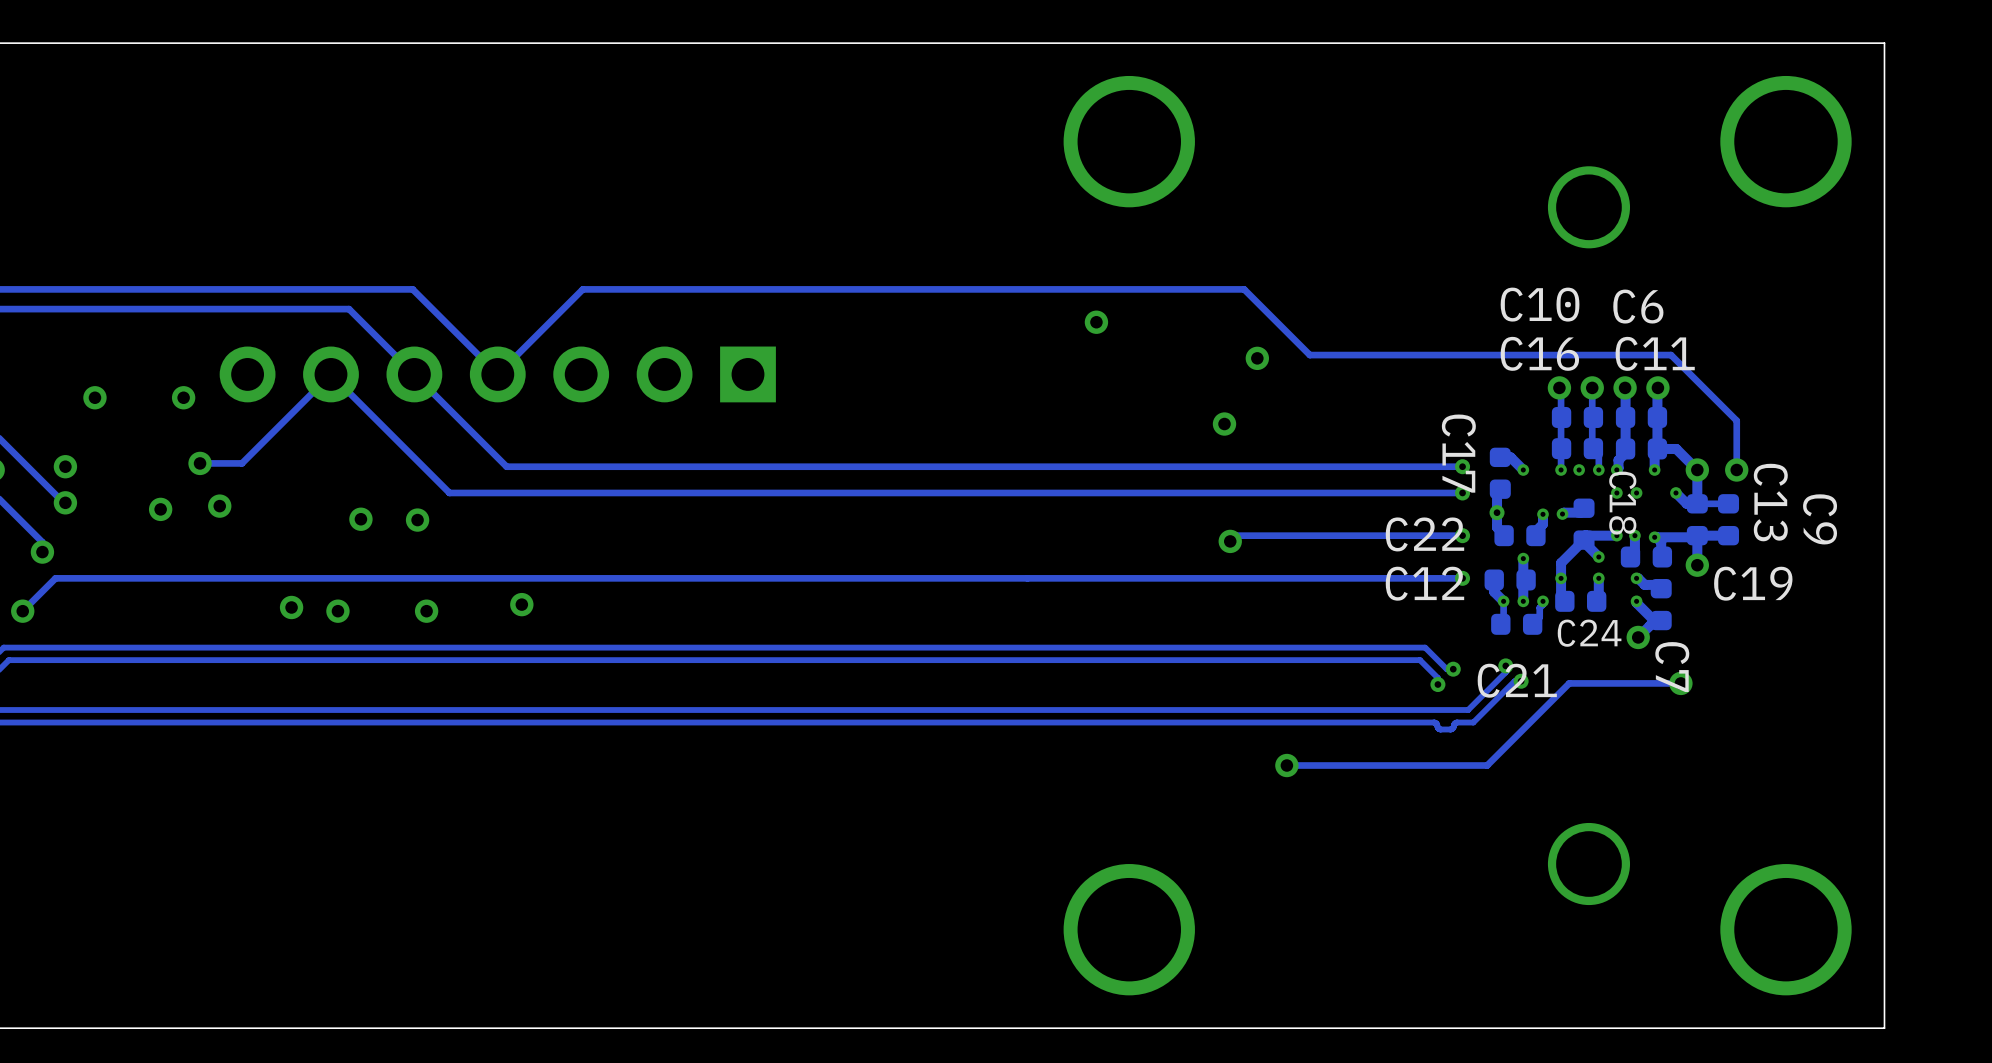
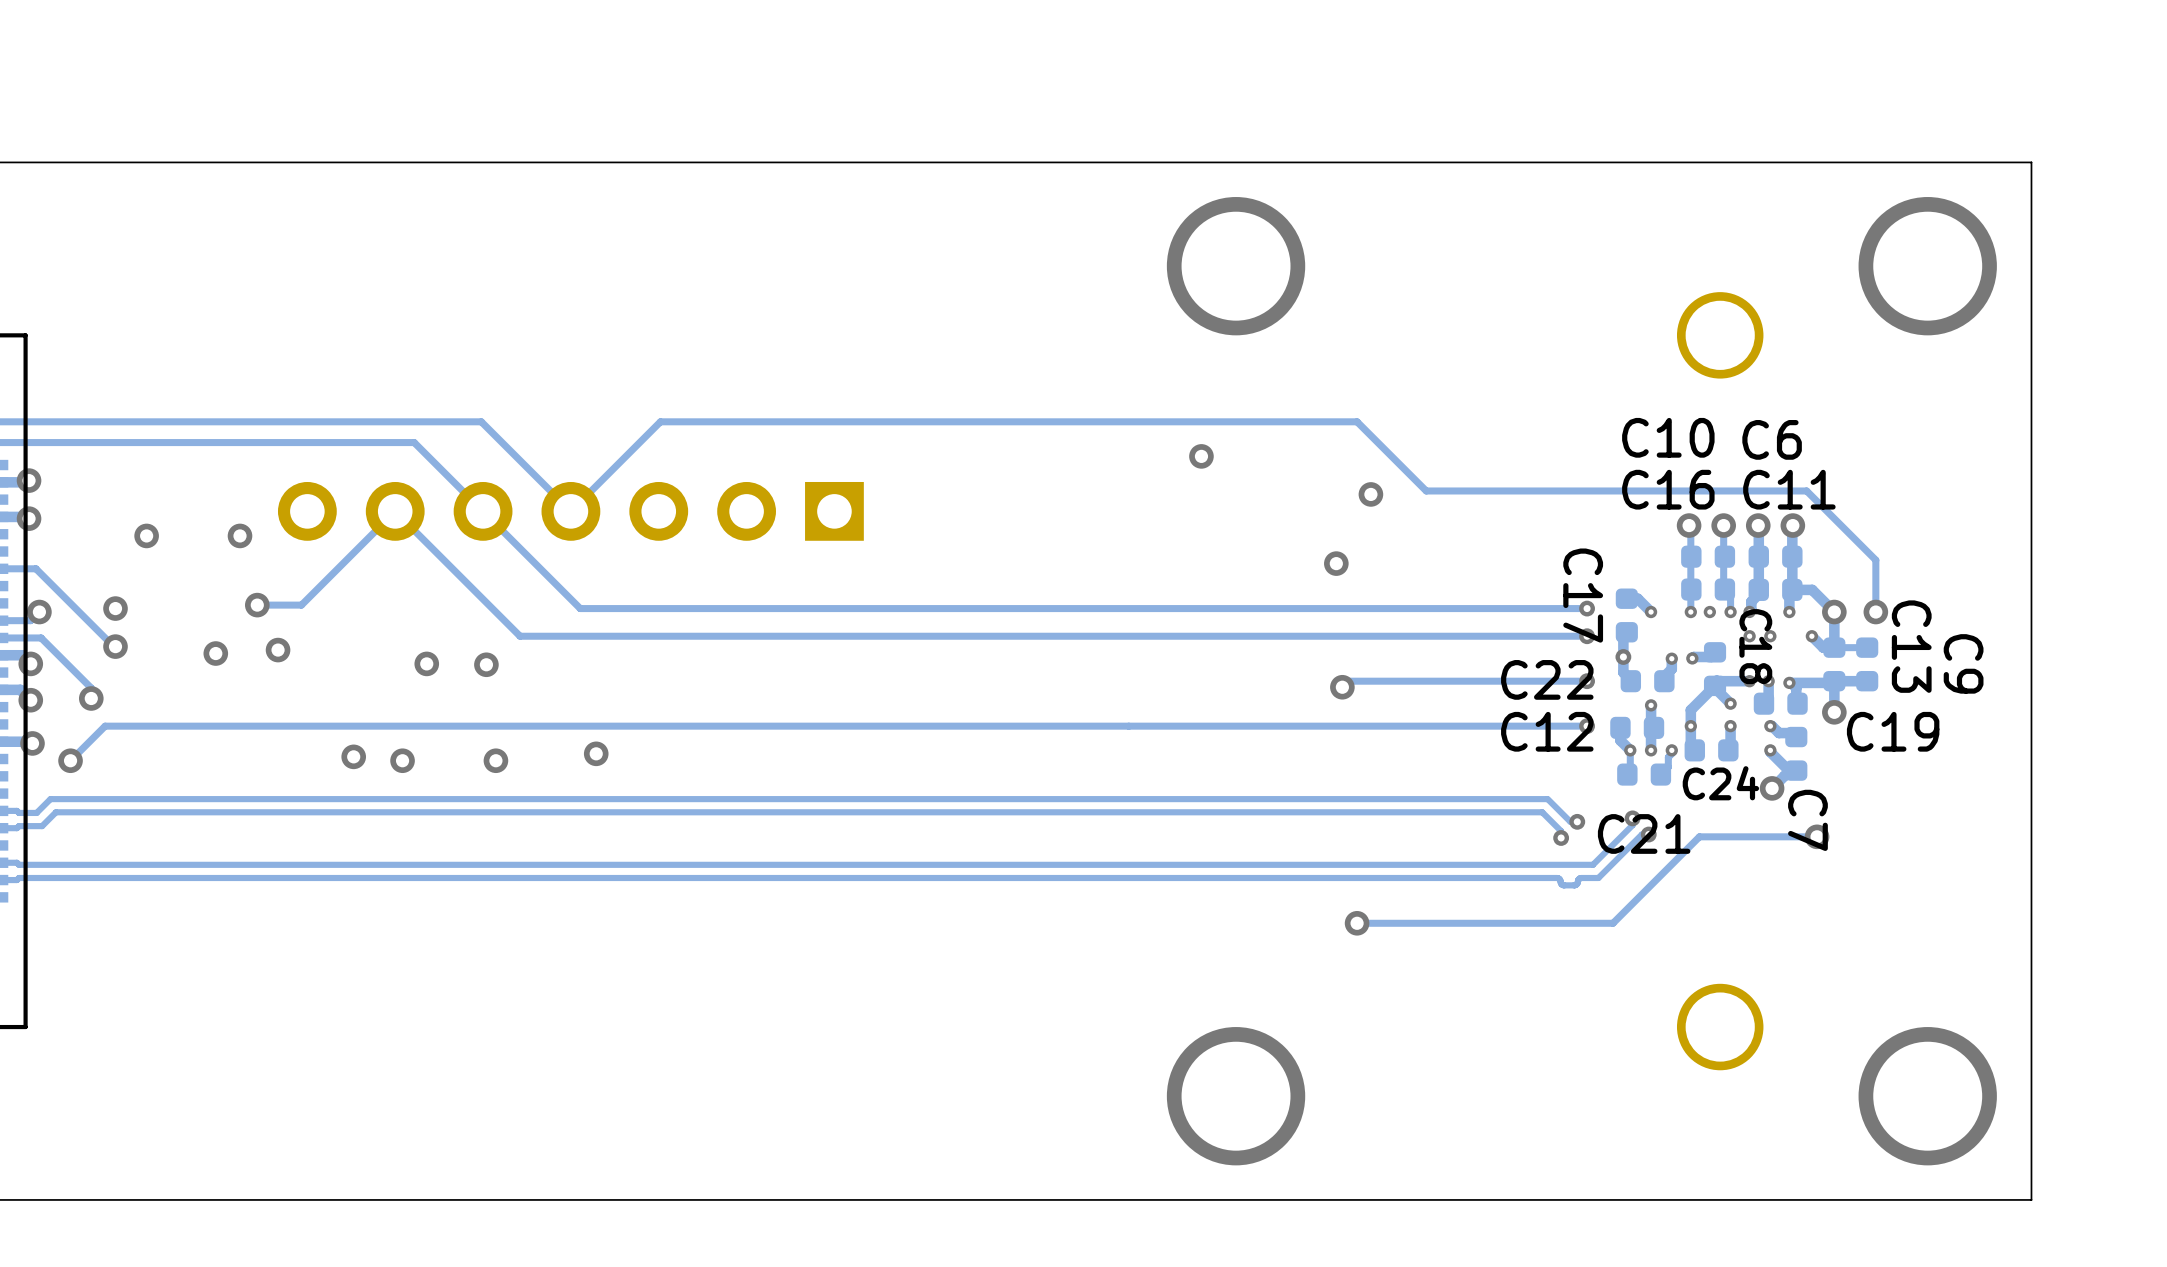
track: none -> (1402, 923) (1357, 923)
via position: (1286, 765) -> (1357, 923)

